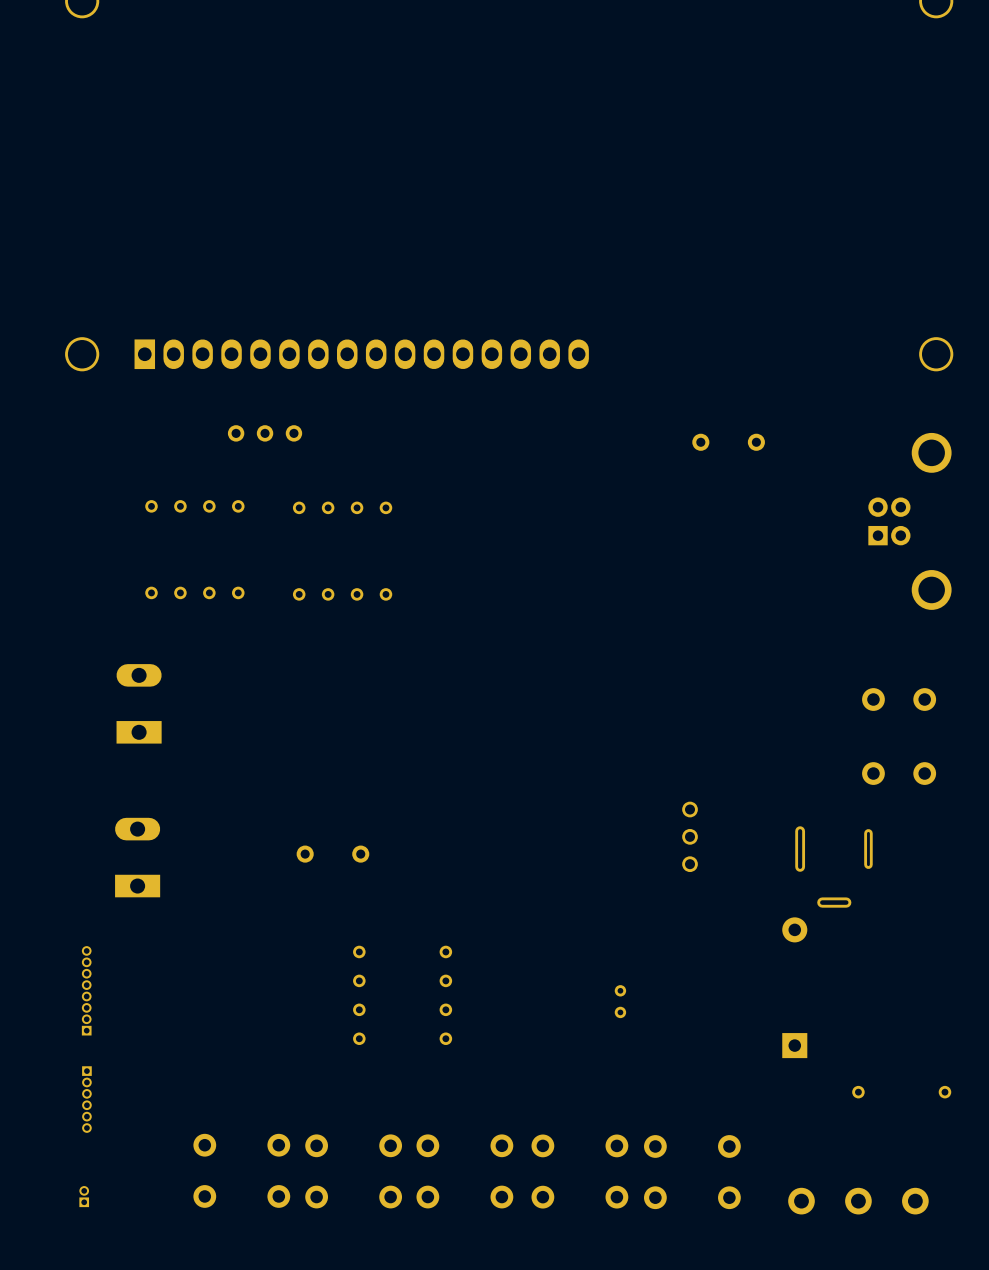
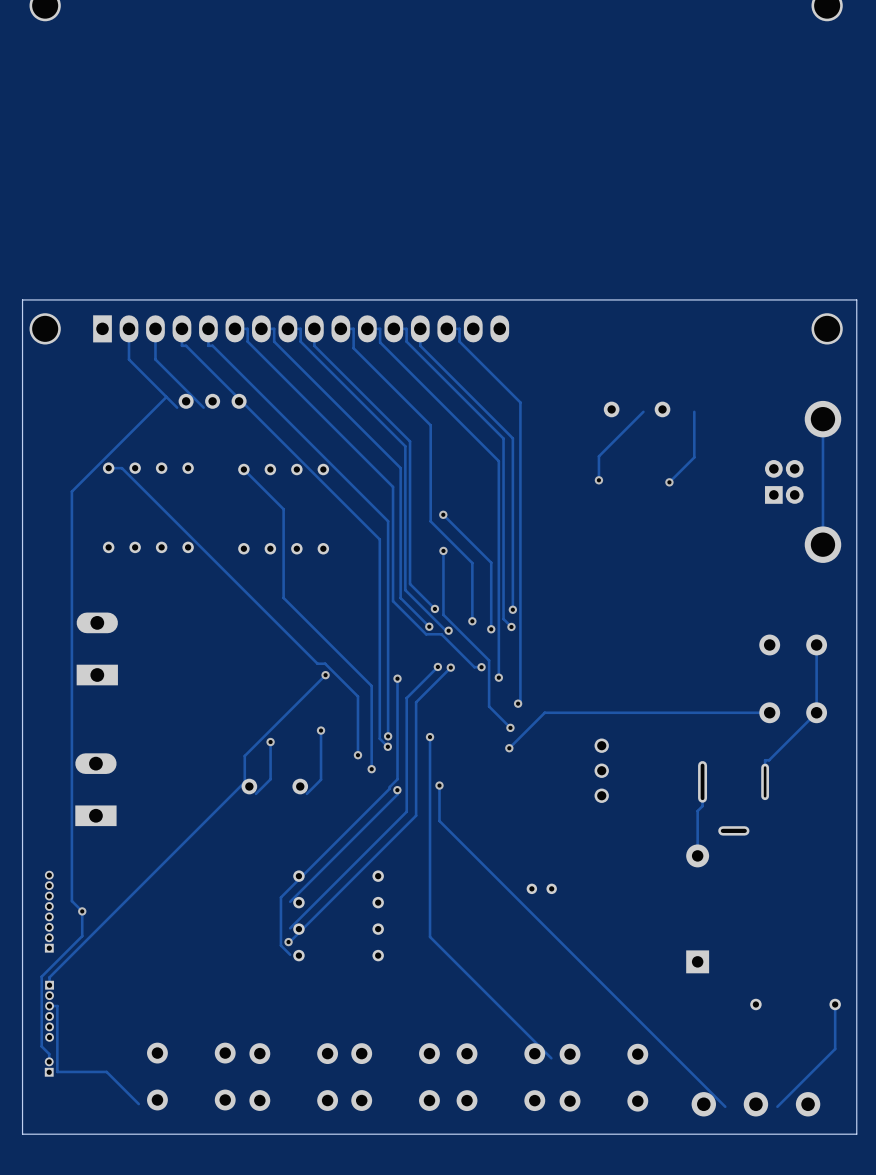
board edge: none -> (856, 299) (22, 299) (22, 1134) (856, 1134) (856, 299)
track: none -> (128, 328) (128, 359) (177, 407)
track: none -> (155, 328) (155, 359) (203, 407)
track: none -> (181, 328) (181, 345) (186, 345) (379, 539) (379, 738) (387, 746)
track: none -> (208, 328) (208, 345) (212, 345) (388, 521) (388, 736)
track: none -> (234, 328) (247, 328) (247, 341) (393, 486) (393, 601) (426, 634) (441, 634) (474, 667) (481, 667)
track: none -> (261, 328) (274, 328) (274, 341) (400, 468) (400, 598) (429, 626)
track: none -> (287, 328) (300, 328) (300, 341) (405, 446) (405, 590) (445, 630) (448, 630)
track: none -> (314, 328) (314, 345) (410, 441) (410, 584) (434, 608)
track: none -> (340, 328) (353, 328) (353, 348) (430, 425) (430, 521) (472, 563) (472, 621)
track: none -> (367, 328) (380, 328) (380, 342) (498, 461) (498, 677)
track: none -> (393, 328) (406, 328) (406, 341) (503, 438) (503, 619) (511, 626)
track: none -> (420, 328) (420, 345) (512, 438) (512, 609)
track: none -> (446, 328) (459, 328) (459, 341) (520, 402) (520, 701) (518, 703)
track: none -> (166, 397) (71, 491) (71, 901) (82, 911) (82, 936) (41, 976) (41, 1046) (49, 1054) (49, 1061)
track: none -> (643, 411) (598, 456) (598, 480)
track: none -> (694, 411) (694, 457) (669, 482)
track: none -> (822, 419) (822, 544)
track: none -> (108, 468) (121, 468) (317, 663) (325, 663) (357, 696) (357, 755)
track: none -> (243, 469) (283, 509) (283, 597) (371, 686) (371, 769)
via: none -> (598, 480)
via: none -> (669, 482)
track: none -> (443, 514) (491, 562) (491, 629)
via: none -> (443, 514)
track: none -> (443, 550) (443, 614) (489, 660) (489, 706) (510, 727)
via: none -> (443, 550)
via: none -> (434, 608)
via: none -> (512, 609)
via: none -> (472, 621)
via: none -> (429, 626)
via: none -> (511, 626)
via: none -> (491, 629)
via: none -> (448, 630)
track: none -> (816, 644) (816, 712) (769, 760) (765, 760) (765, 781)
track: none -> (437, 666) (406, 698) (406, 811) (290, 928)
via: none -> (437, 666)
via: none -> (481, 667)
track: none -> (450, 667) (416, 702) (416, 815) (288, 942)
via: none -> (450, 667)
track: none -> (325, 675) (244, 755) (244, 782) (49, 977) (49, 985)
via: none -> (325, 675)
via: none -> (498, 677)
track: none -> (397, 678) (397, 779) (280, 897) (280, 945) (290, 954)
via: none -> (397, 678)
via: none -> (518, 703)
track: none -> (769, 712) (544, 712) (509, 748)
via: none -> (510, 727)
track: none -> (321, 730) (321, 779) (306, 793)
via: none -> (321, 730)
via: none -> (388, 736)
track: none -> (430, 737) (430, 936) (551, 1058)
via: none -> (430, 737)
track: none -> (270, 742) (270, 779) (255, 793)
via: none -> (270, 742)
via: none -> (387, 746)
via: none -> (509, 748)
via: none -> (357, 755)
via: none -> (371, 769)
track: none -> (702, 781) (702, 806) (697, 811) (697, 855)
track: none -> (439, 785) (439, 820) (725, 1106)
via: none -> (439, 785)
track: none -> (397, 790) (397, 794) (290, 901)
via: none -> (397, 790)
via: none -> (82, 911)
part rotation: 0° (620, 1001) -> 90° clockwise (541, 888)
part position: (620, 1001) -> (541, 888)
via: none -> (288, 942)
track: none -> (835, 1004) (835, 1049) (777, 1106)
track: none -> (49, 1006) (57, 1006) (57, 1071) (106, 1071) (138, 1104)
part position: (84, 1196) -> (49, 1067)

